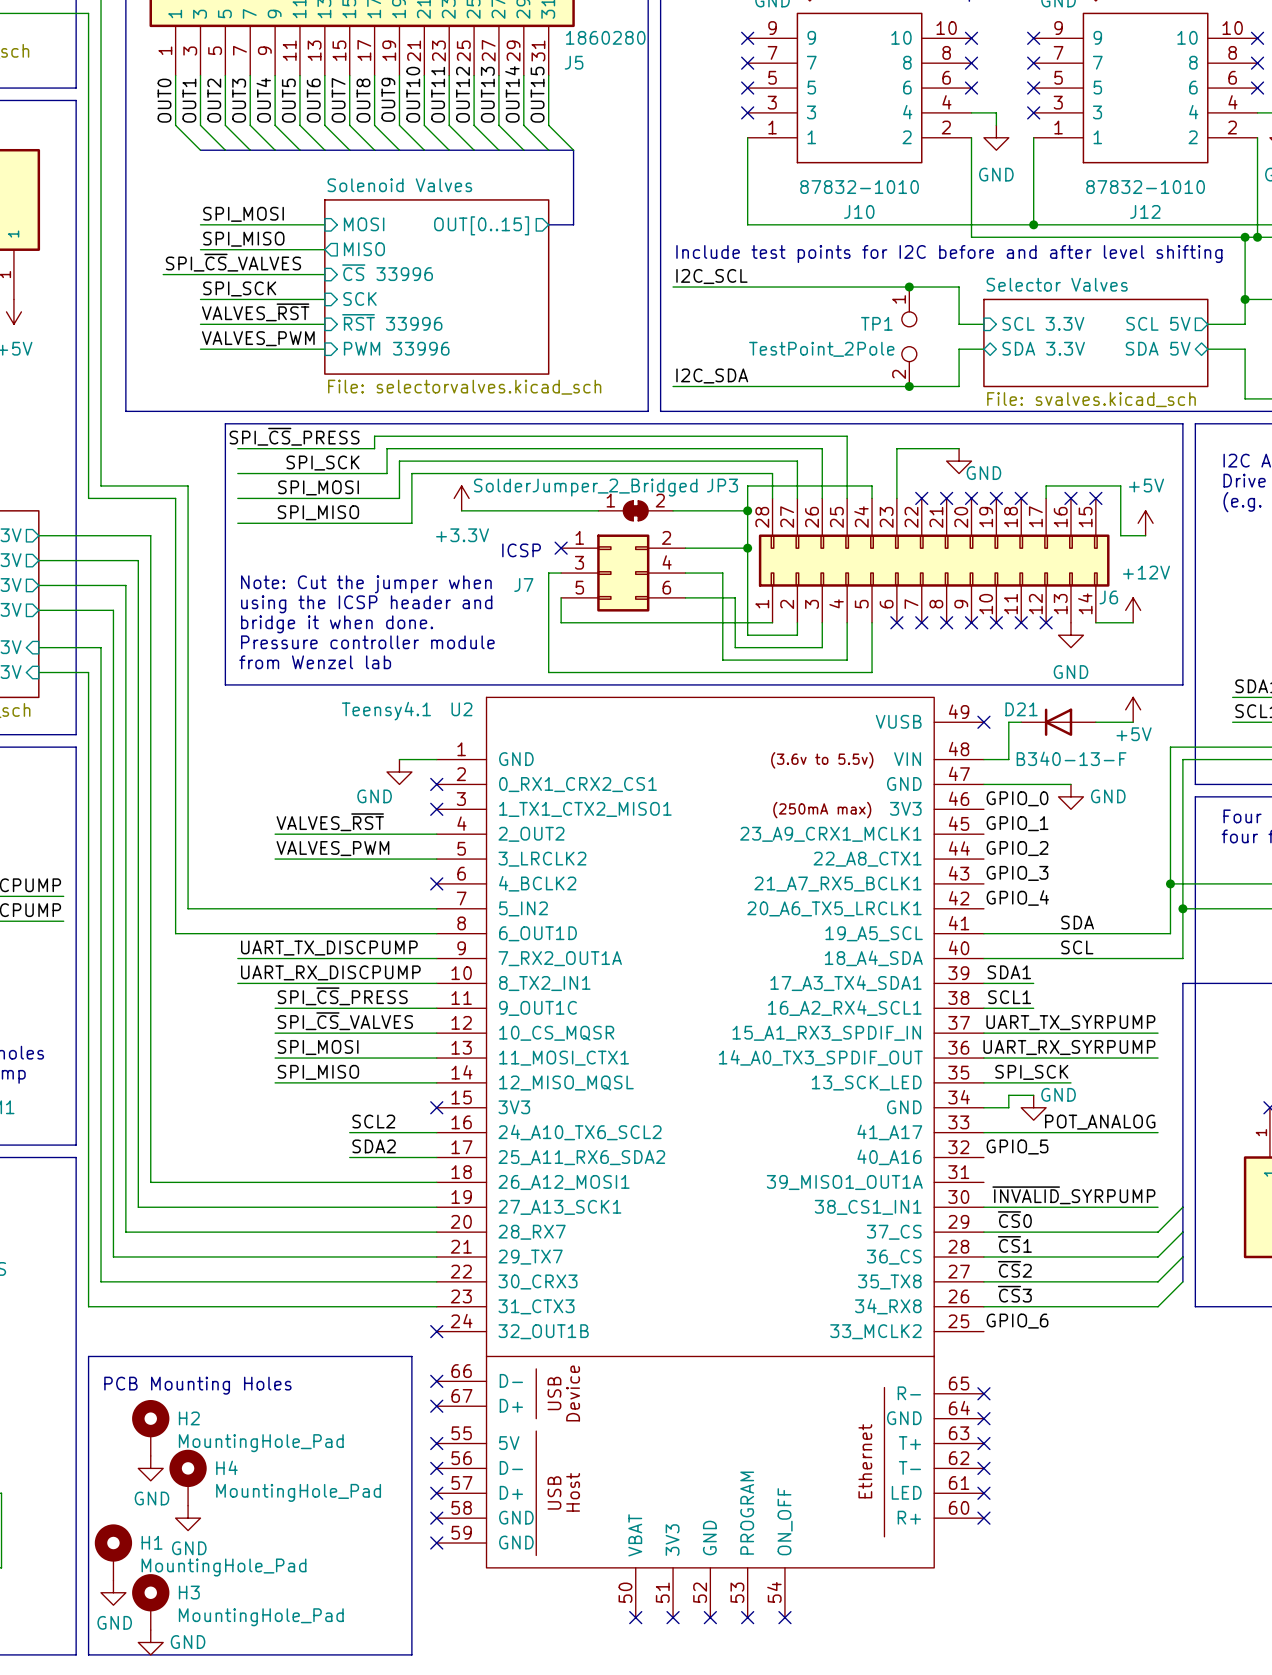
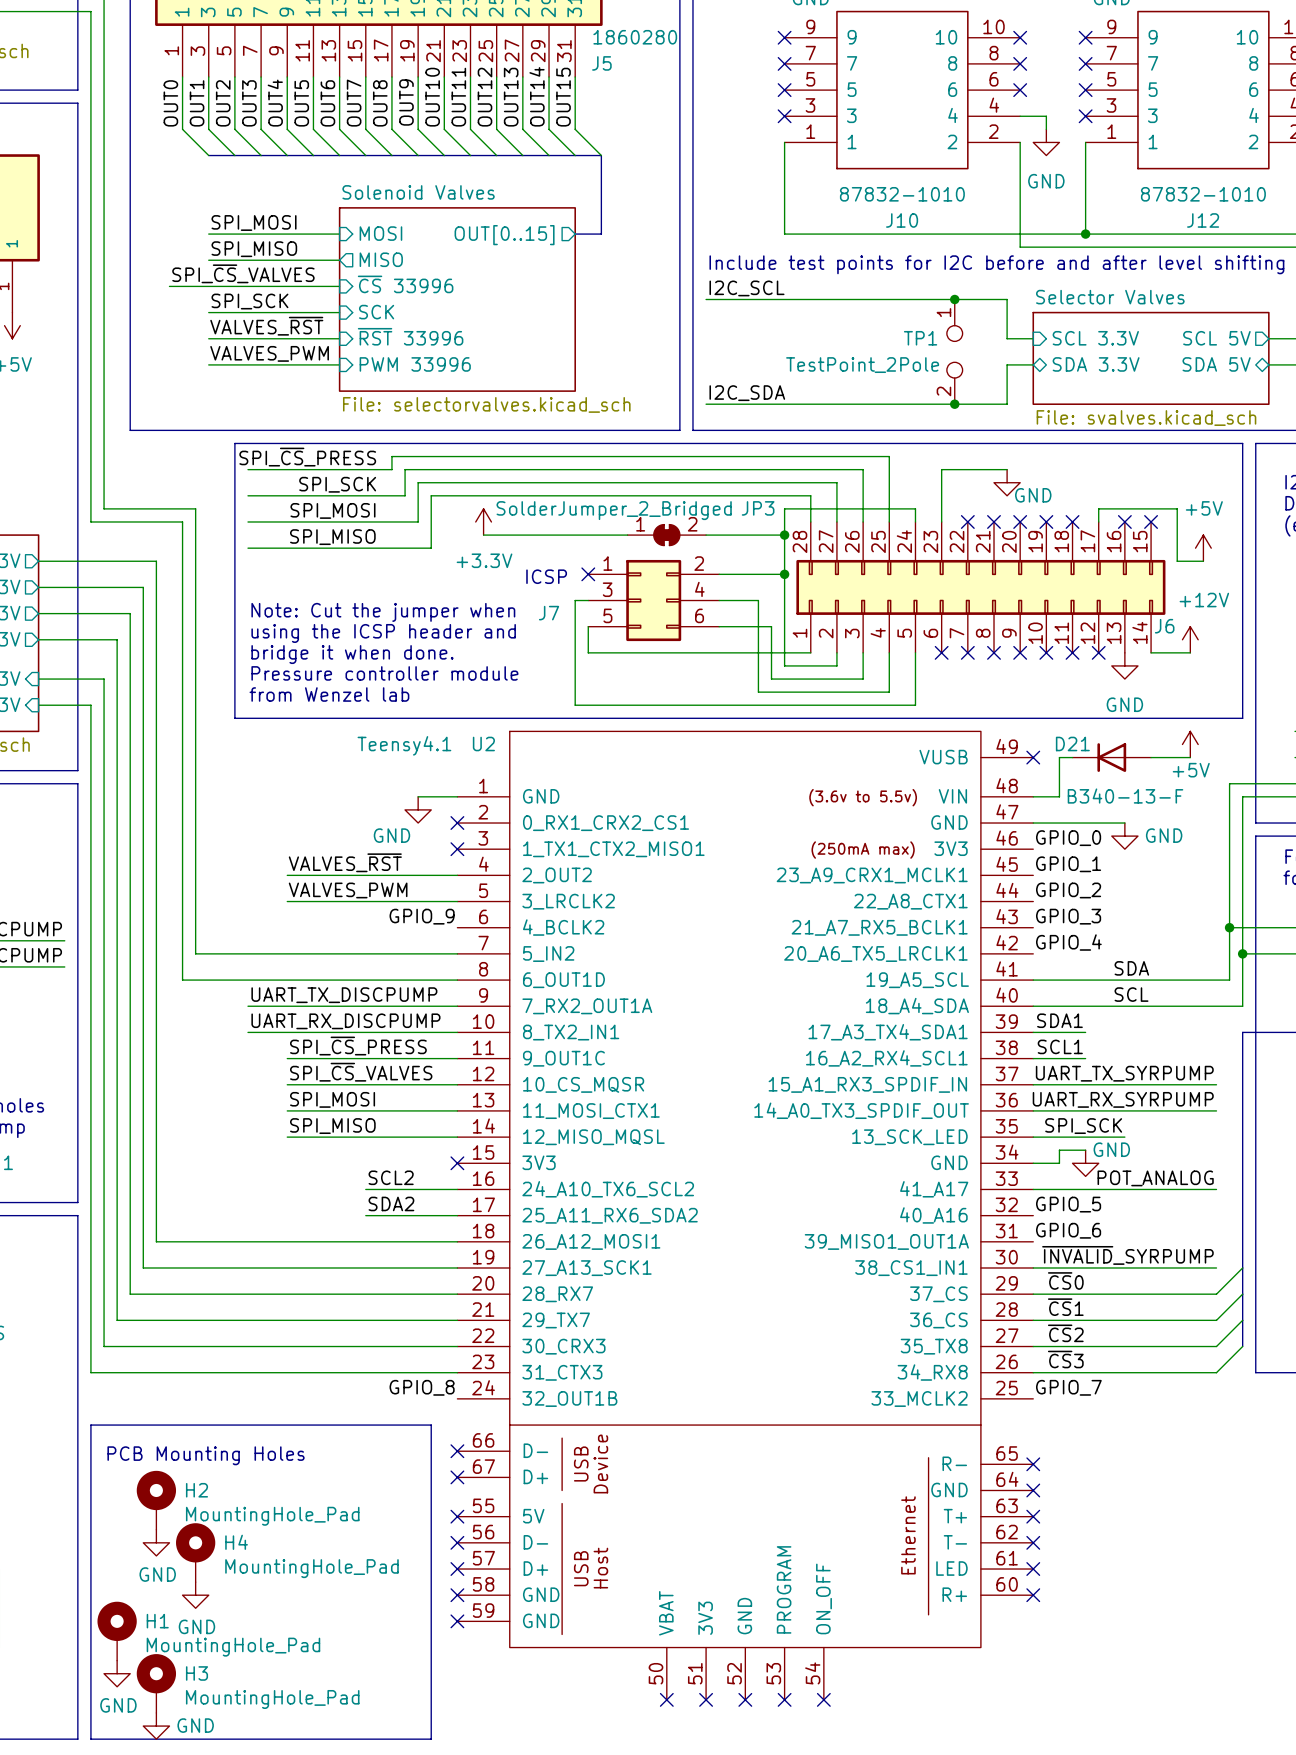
label: none -> GPIO_9 (422, 916)
no-connect mark: (436, 883) -> none
label: none -> GPIO_6 (1068, 1230)
label: none -> GPIO_8 (422, 1387)
label: GPIO_6 (1017, 1321) -> GPIO_7 (1068, 1387)
no-connect mark: (436, 1331) -> none

